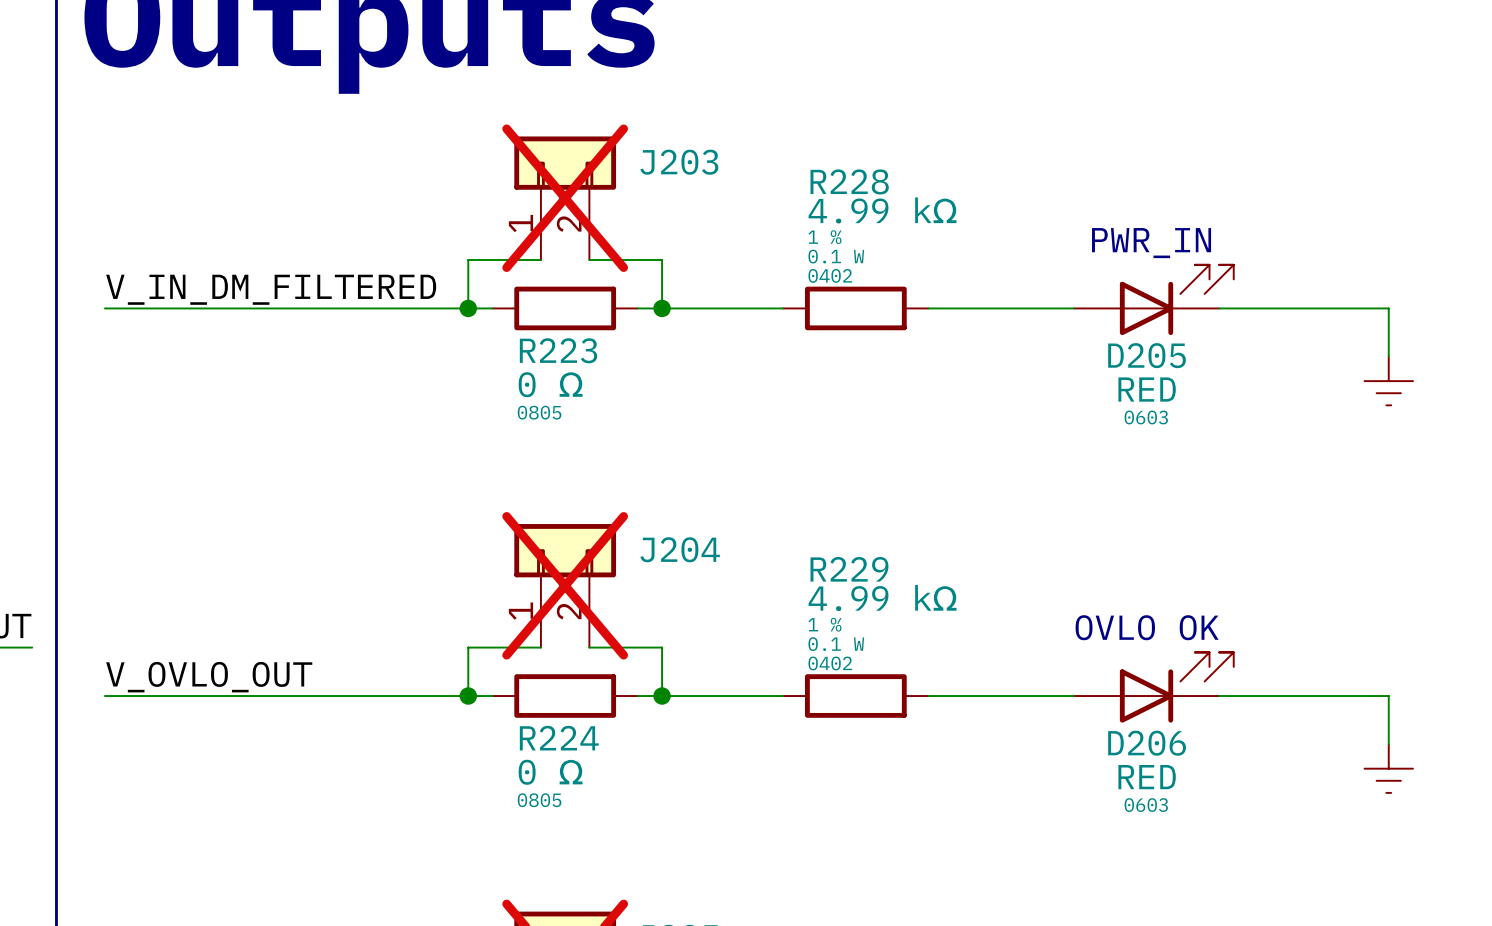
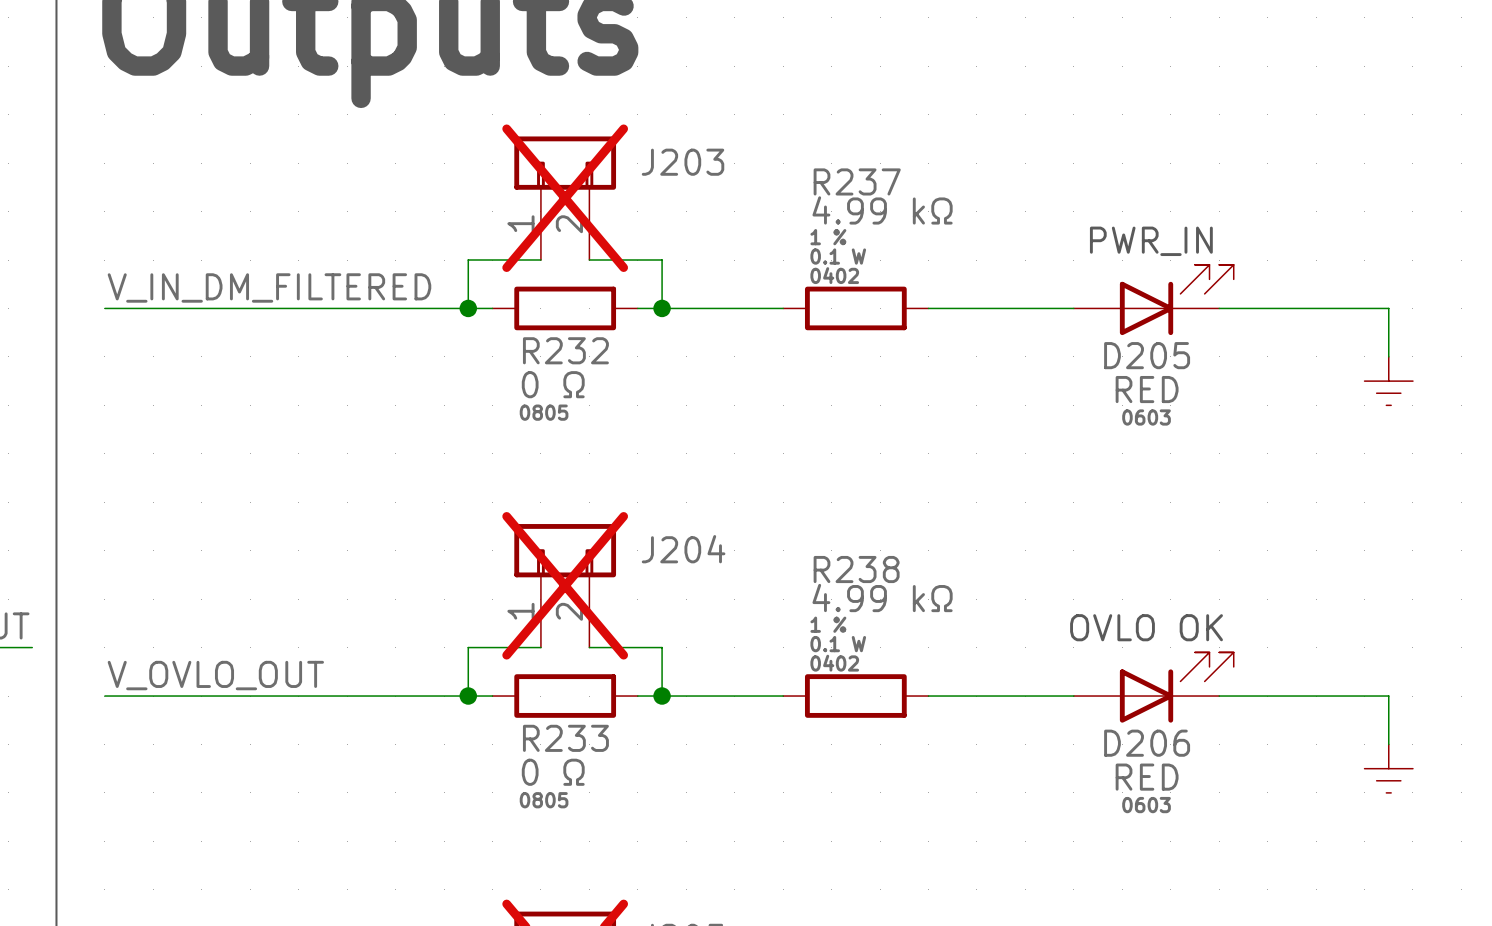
R228 name: R228 (849, 181) -> R237 (857, 181)
R223 name: R223 (558, 350) -> R232 (565, 350)
R229 name: R229 (849, 569) -> R238 (856, 569)
R224 name: R224 (559, 738) -> R233 (565, 738)

